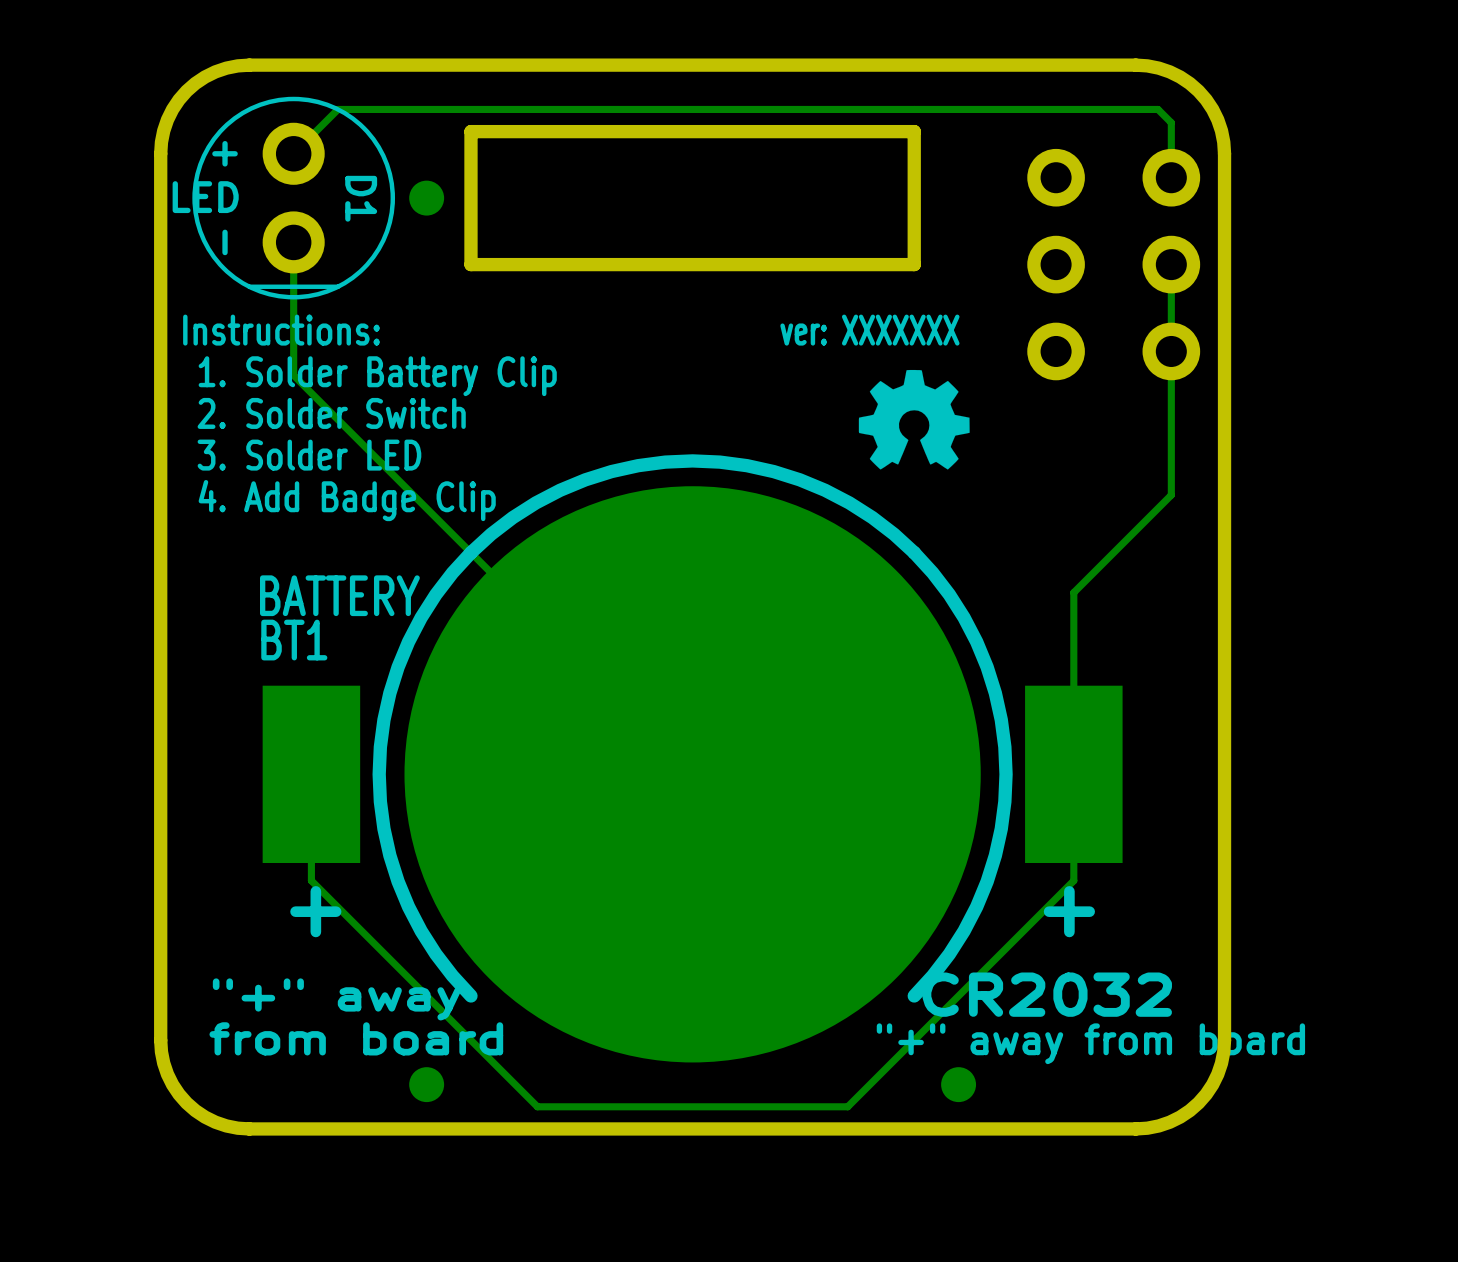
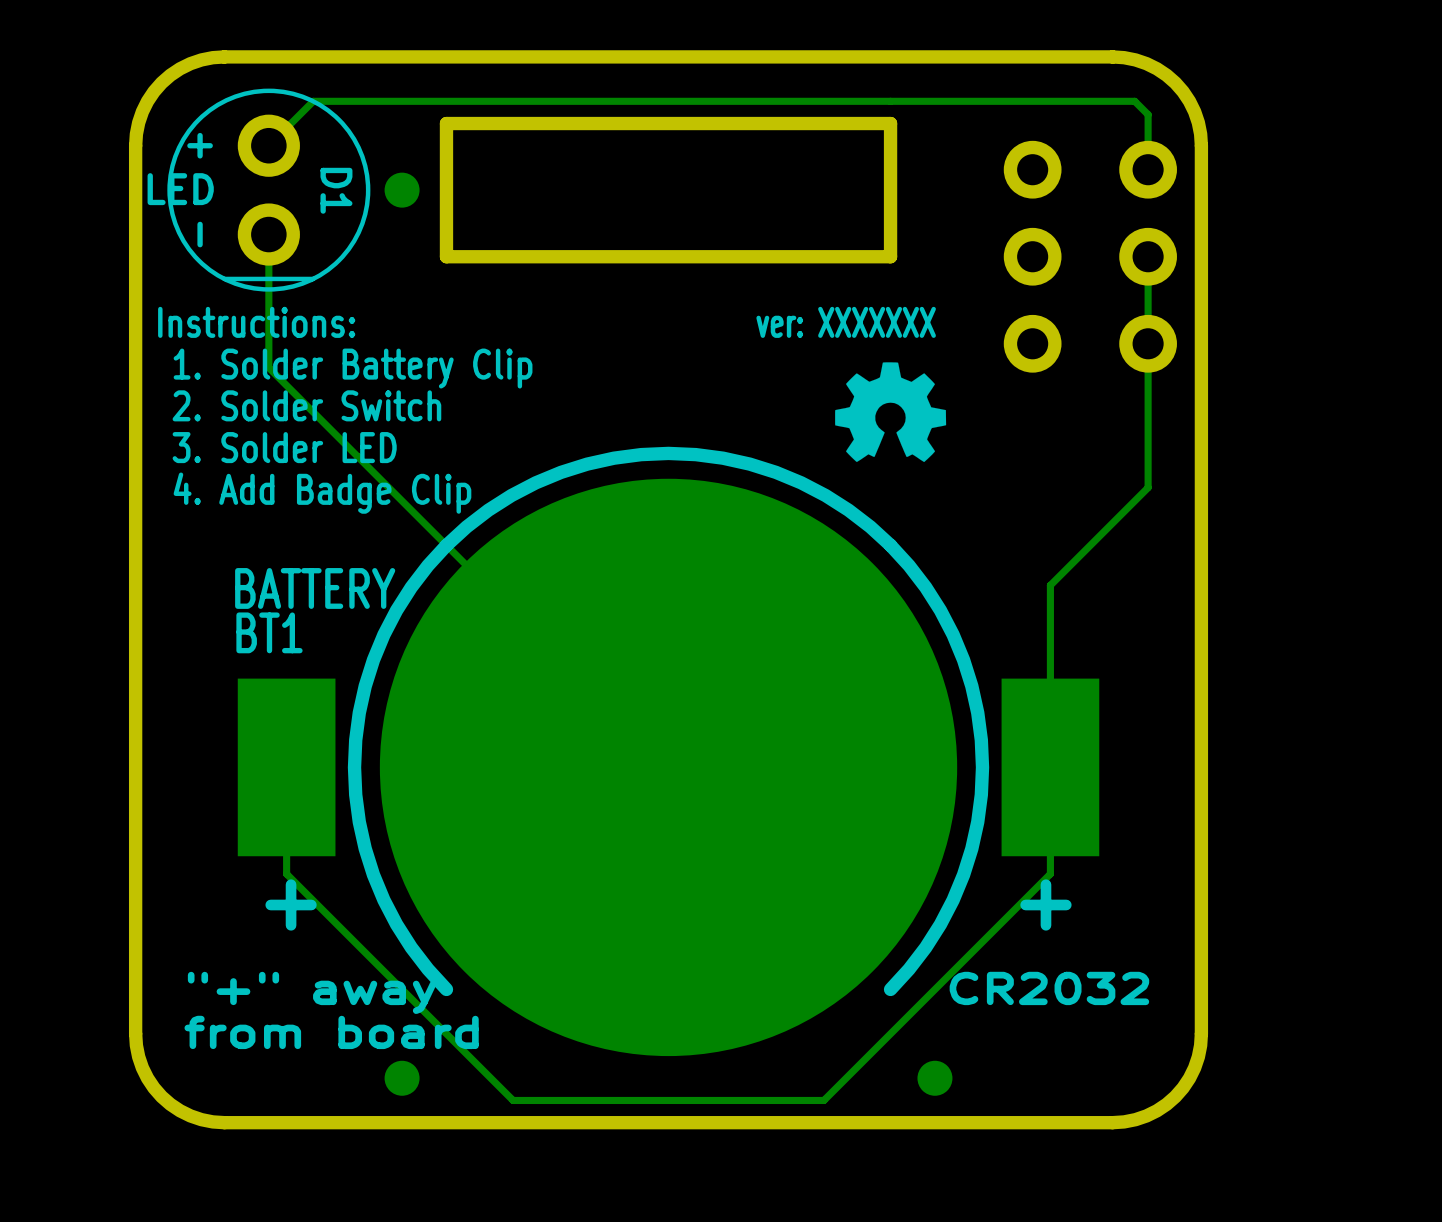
BT1 text: CR2032 (1047, 994) -> none
text: none -> CR2032 (1049, 988)
BT1 text: "+" away from board (1090, 1043) -> none

